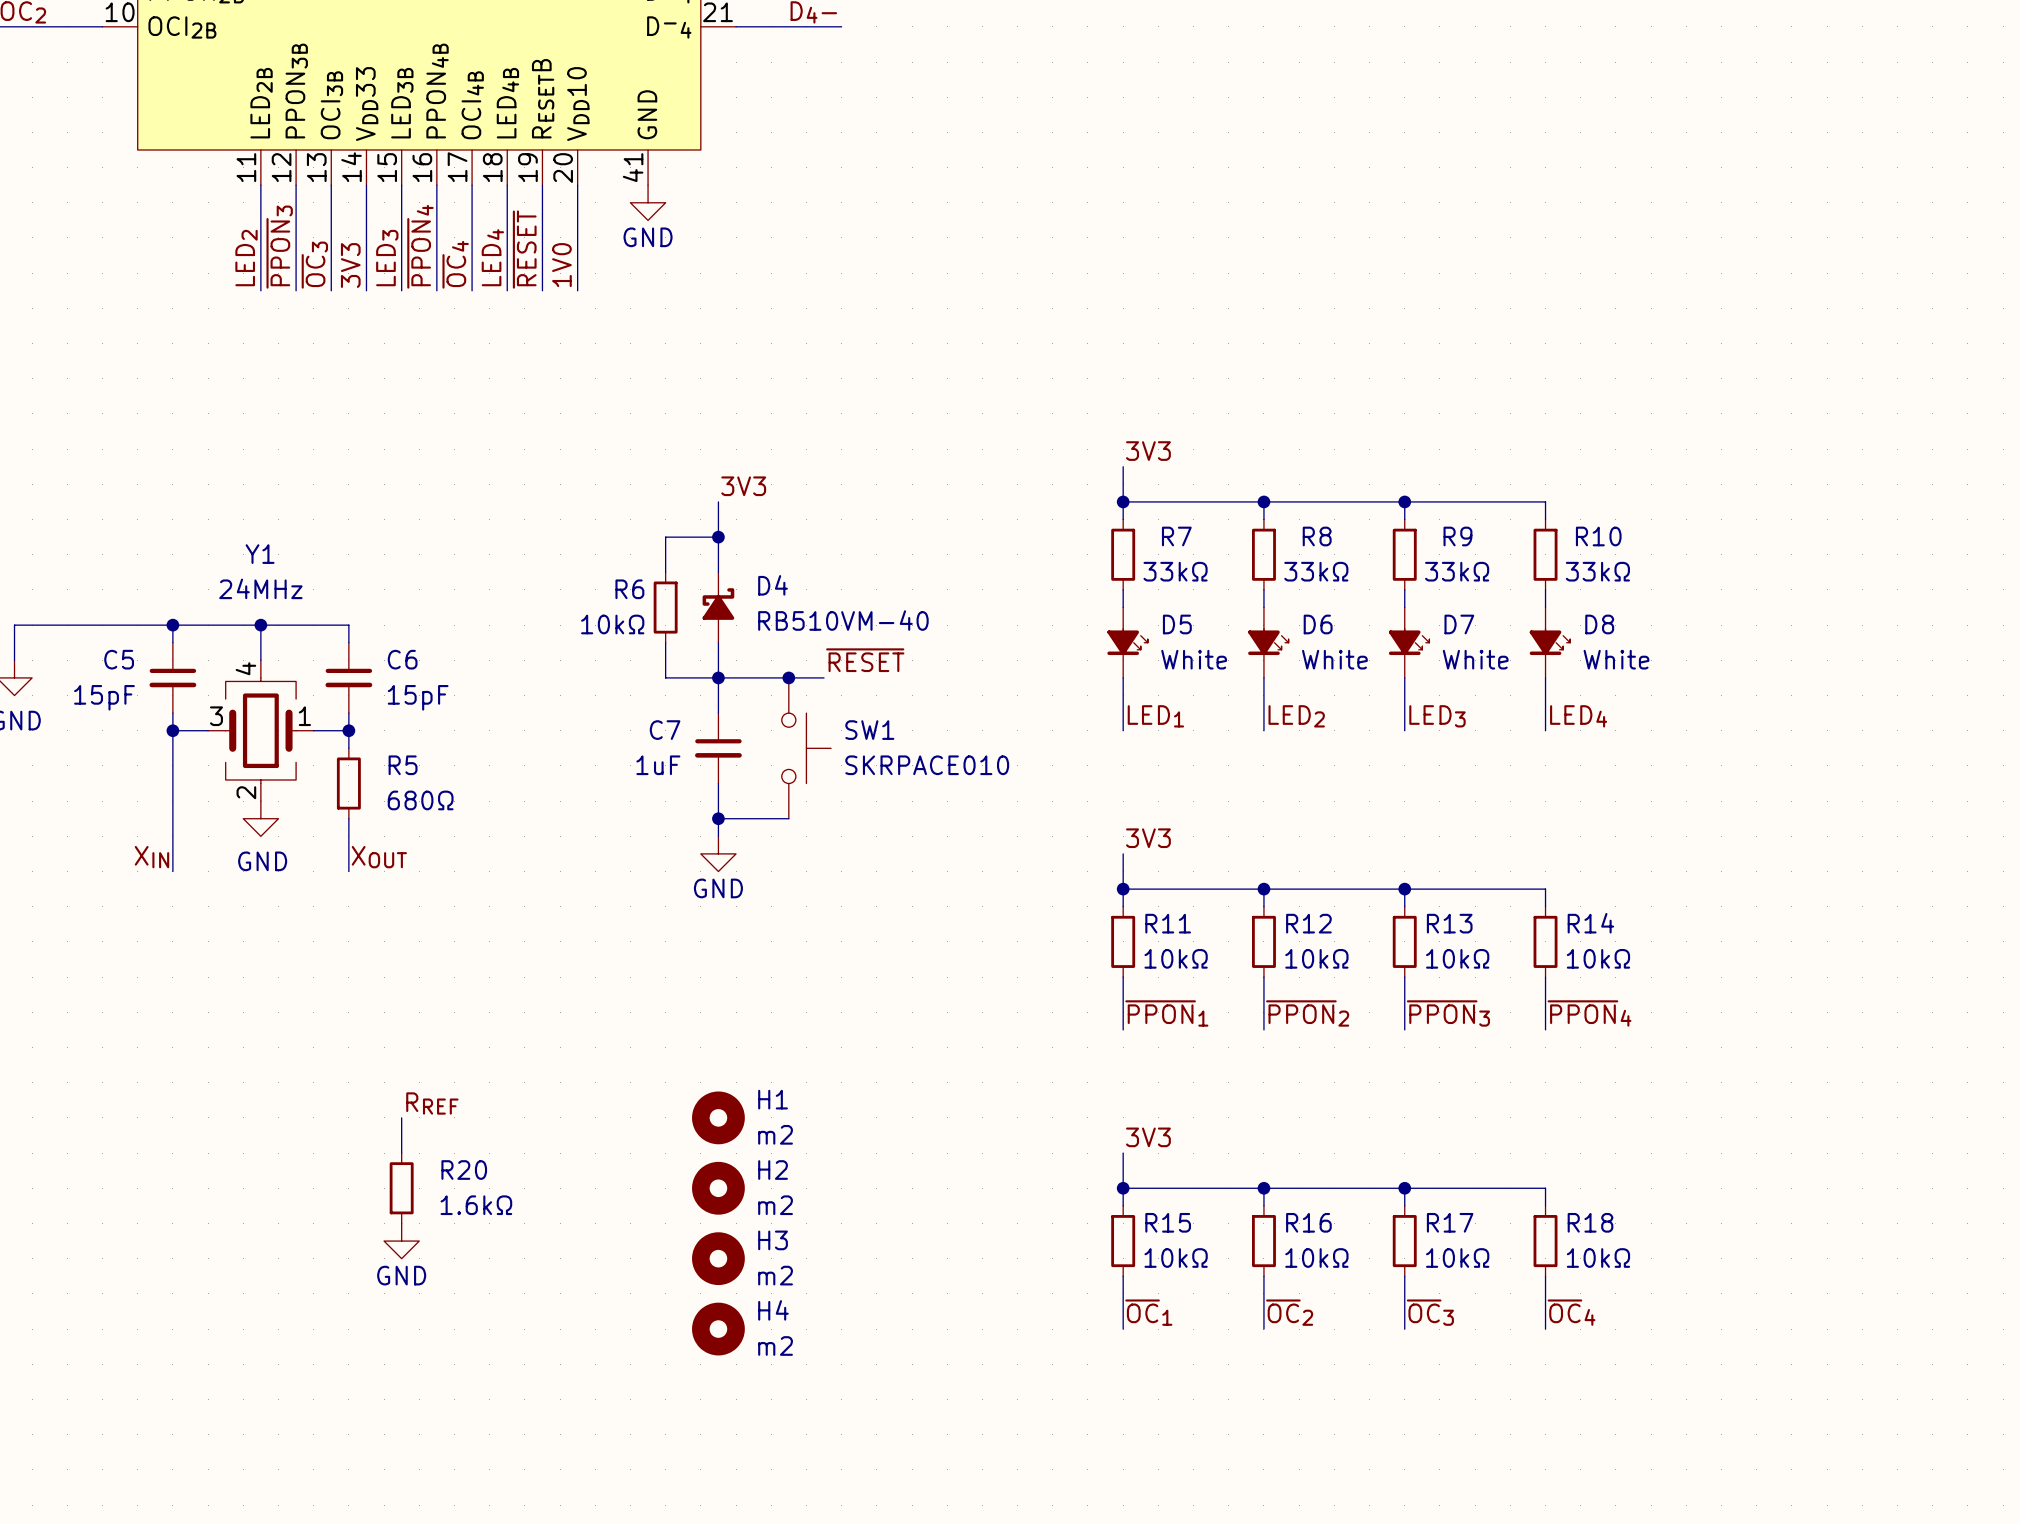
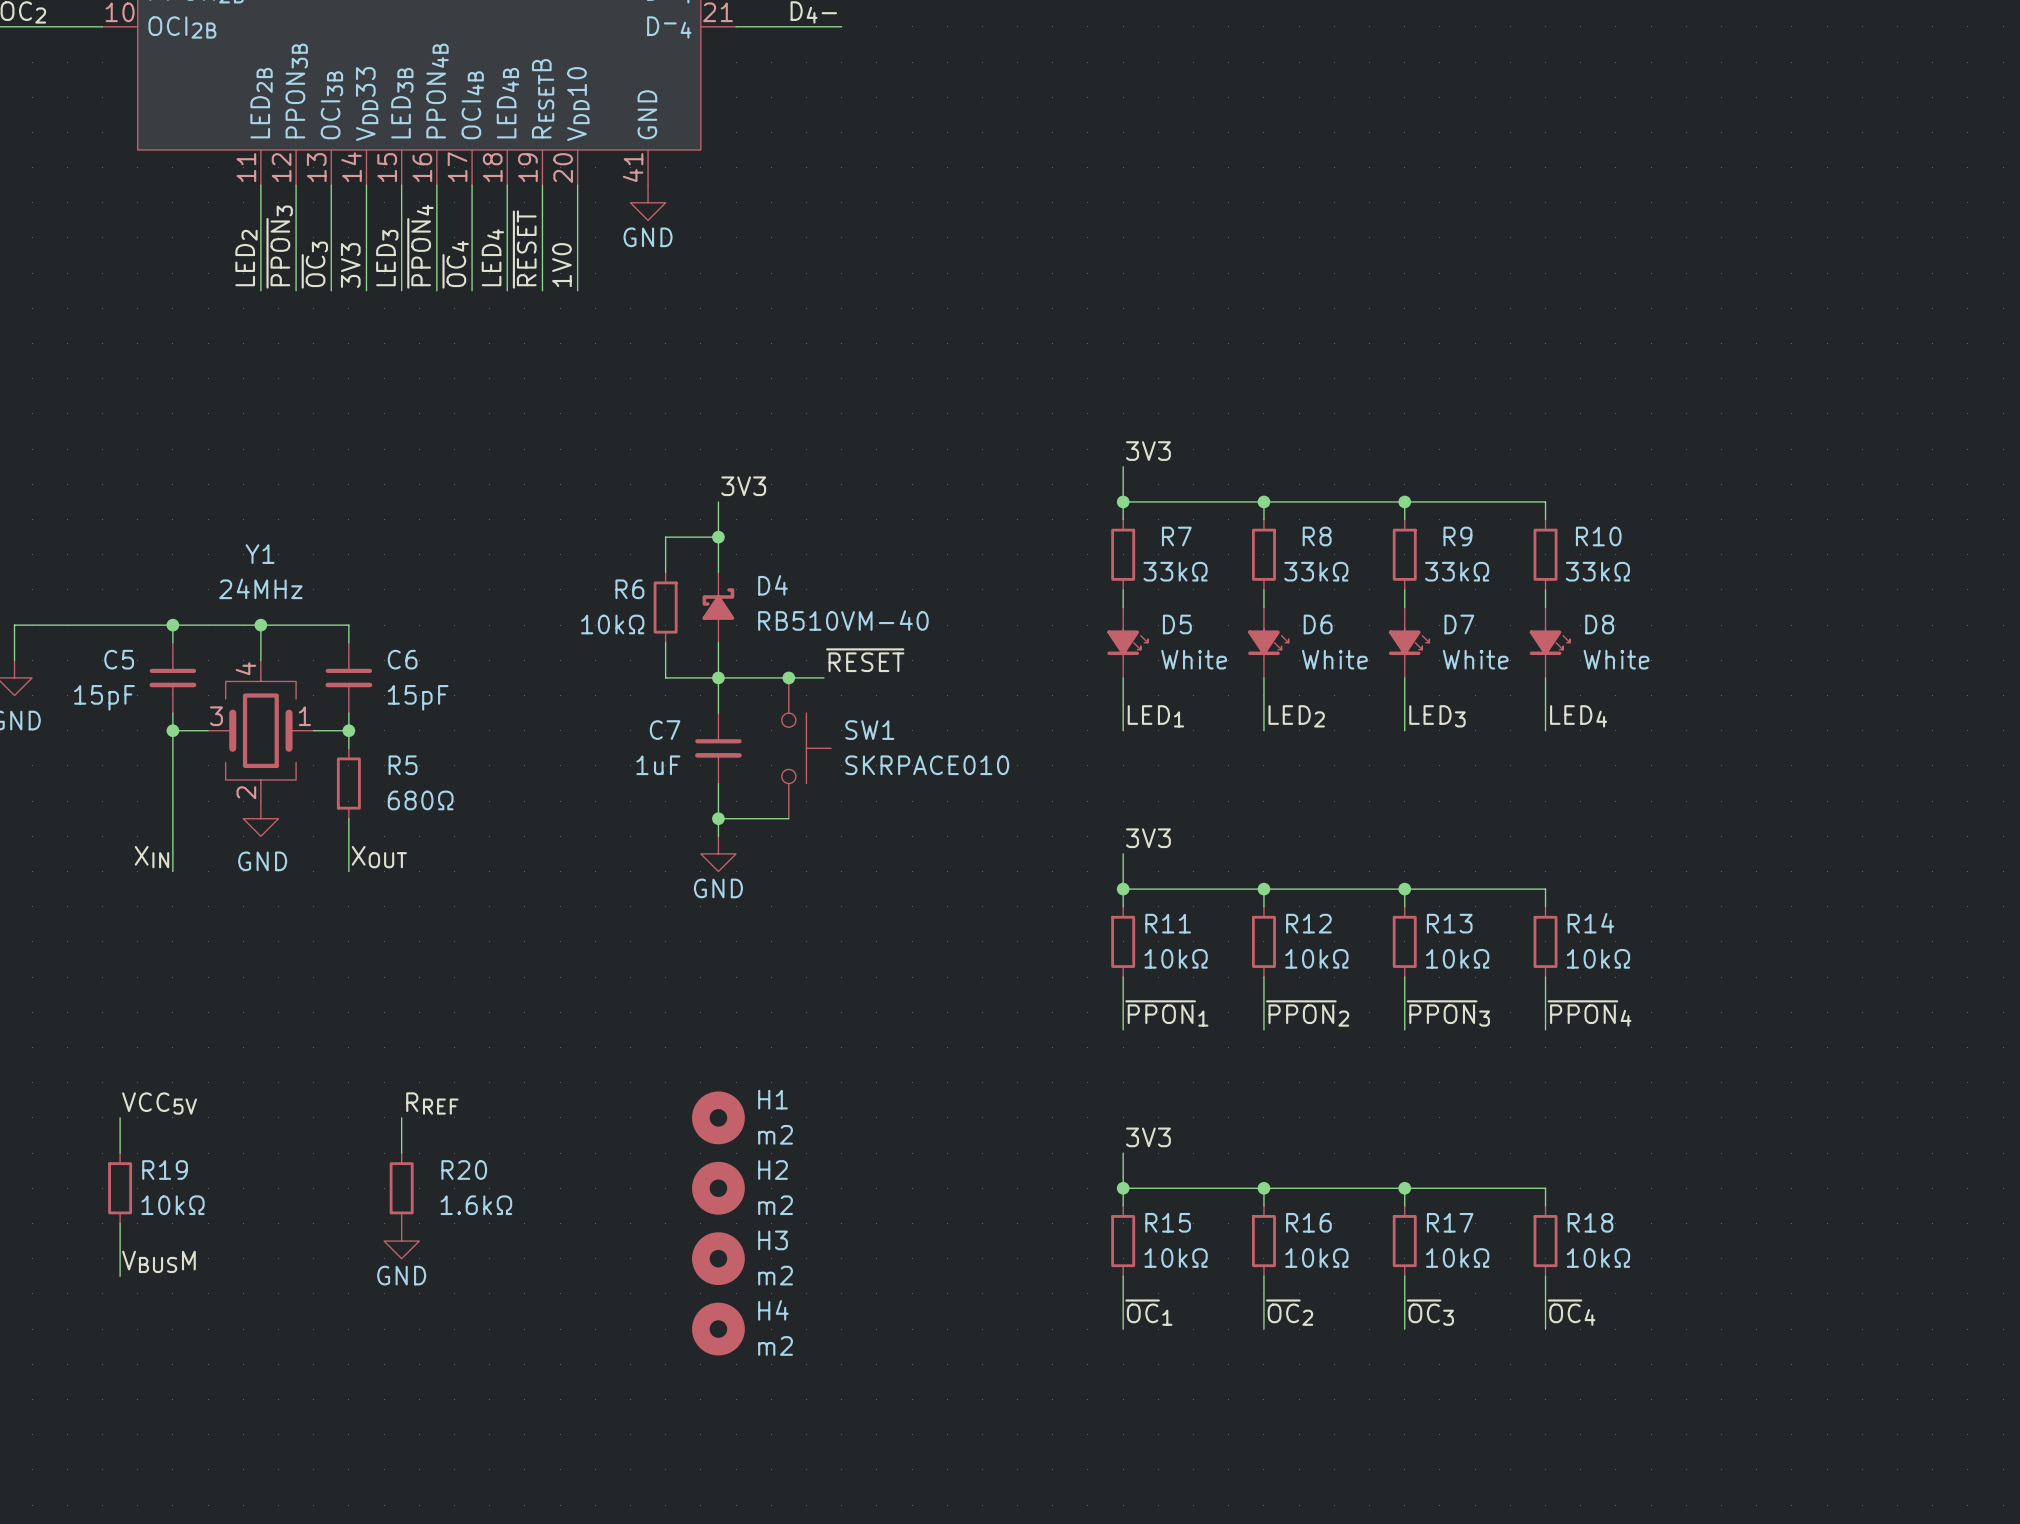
label: none -> VCC5V (159, 1103)
wire: none -> (120, 1117) (120, 1153)
R19: none -> 10kΩ (120, 1188)
wire: none -> (120, 1223) (120, 1276)
label: none -> VBUSM (158, 1261)

